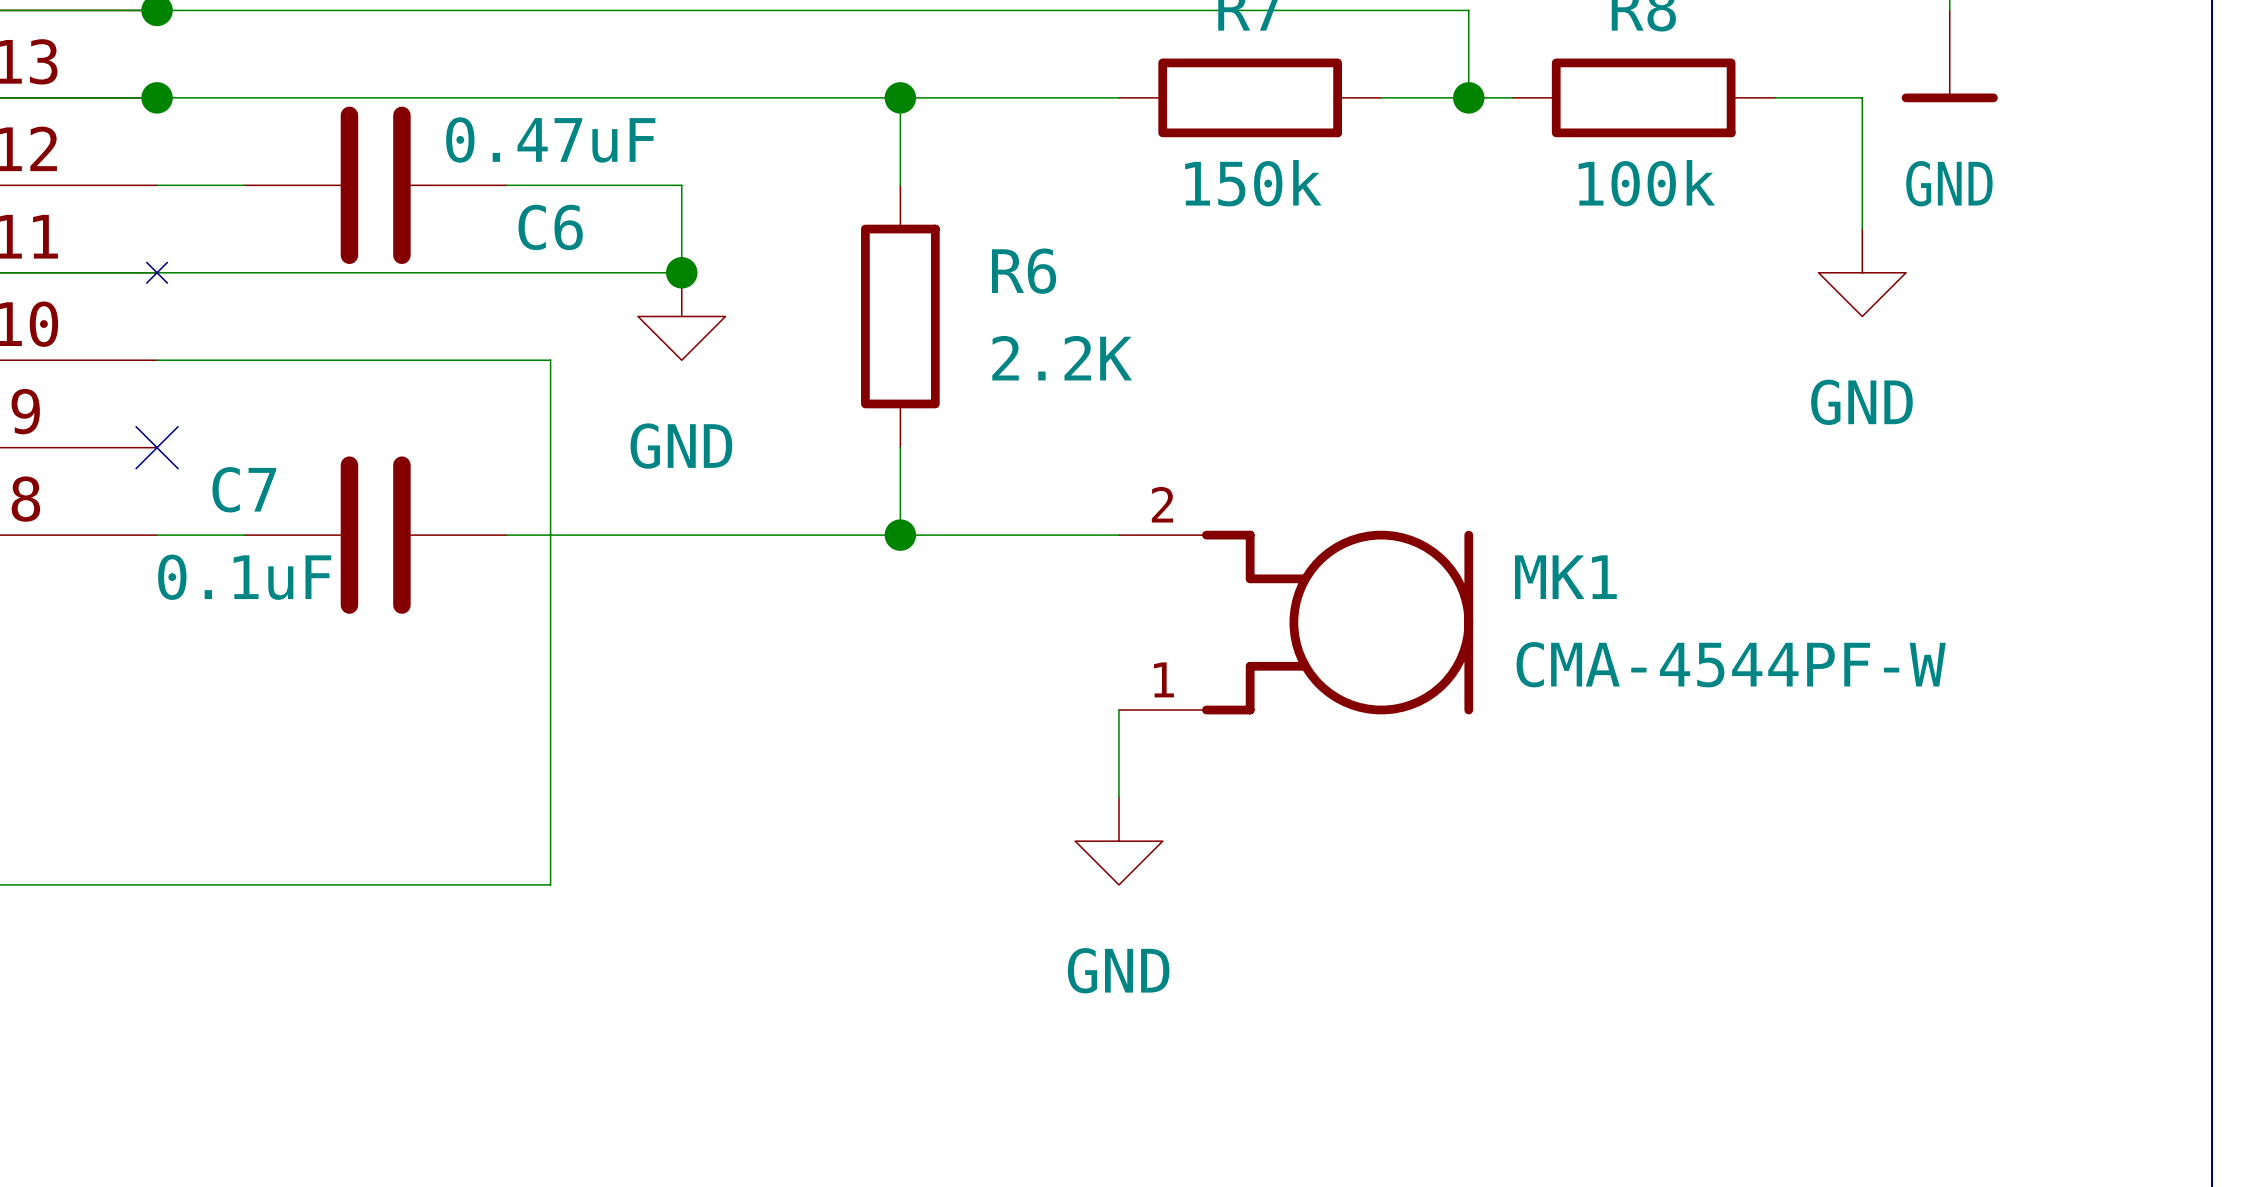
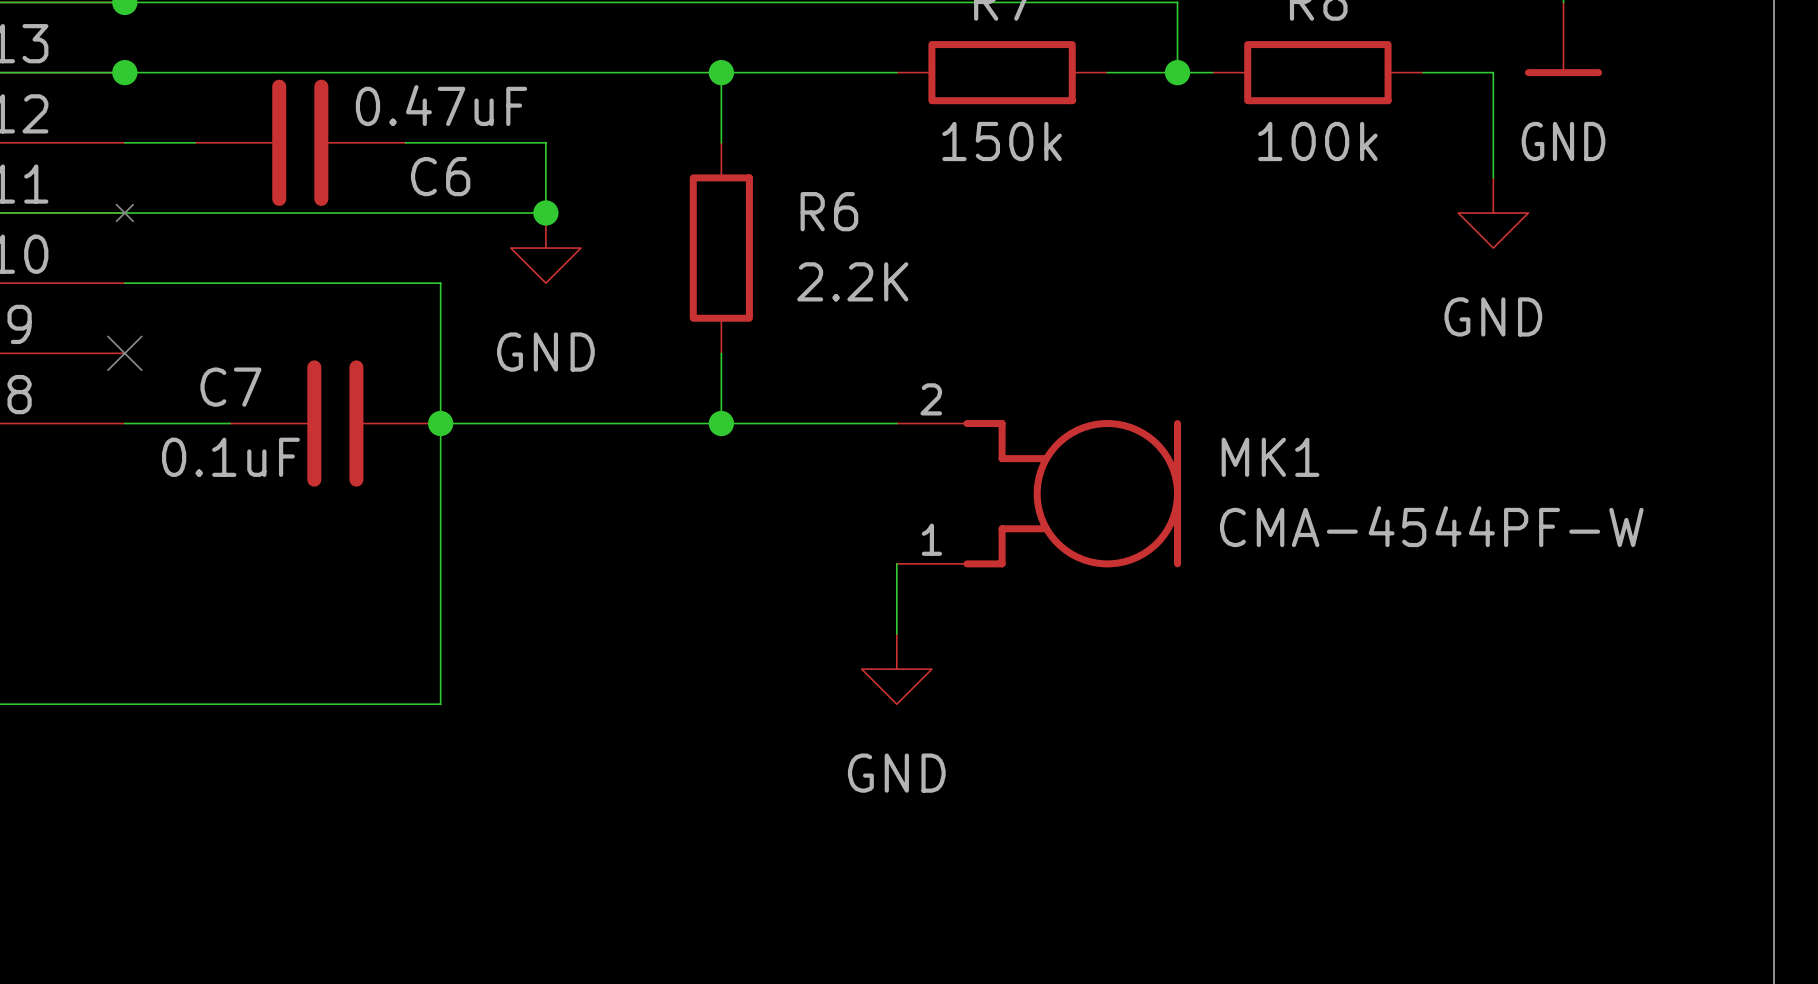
C7 position: (375, 535) -> (335, 423)
junction: none -> (440, 423)

